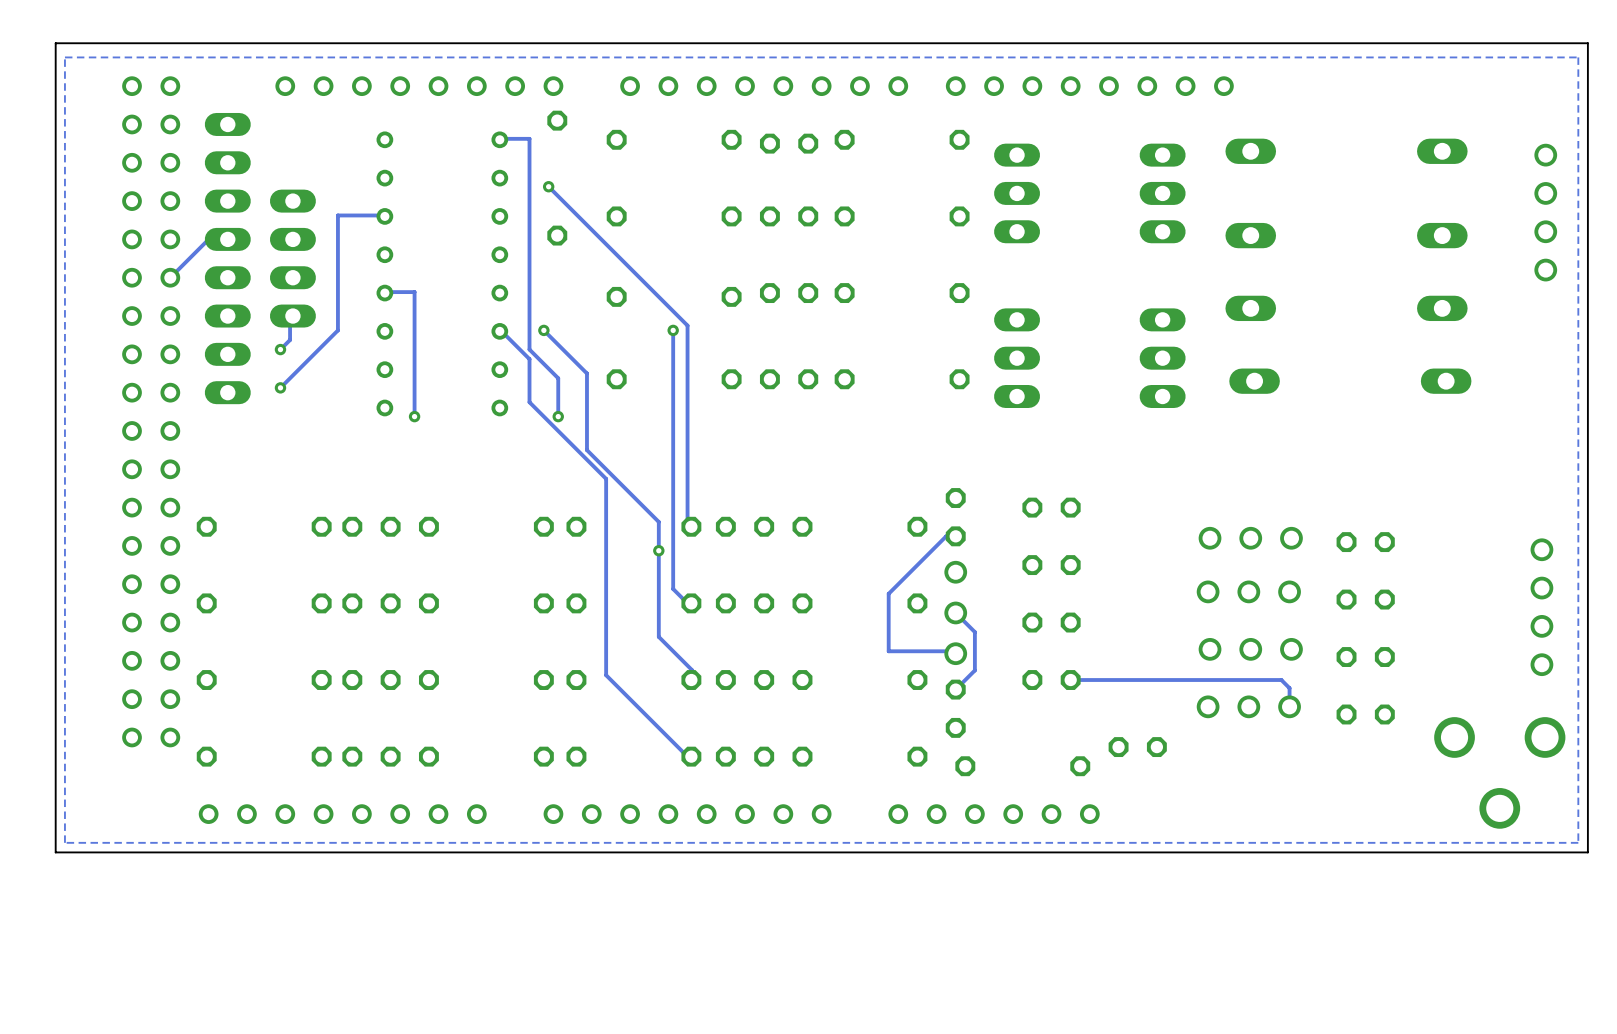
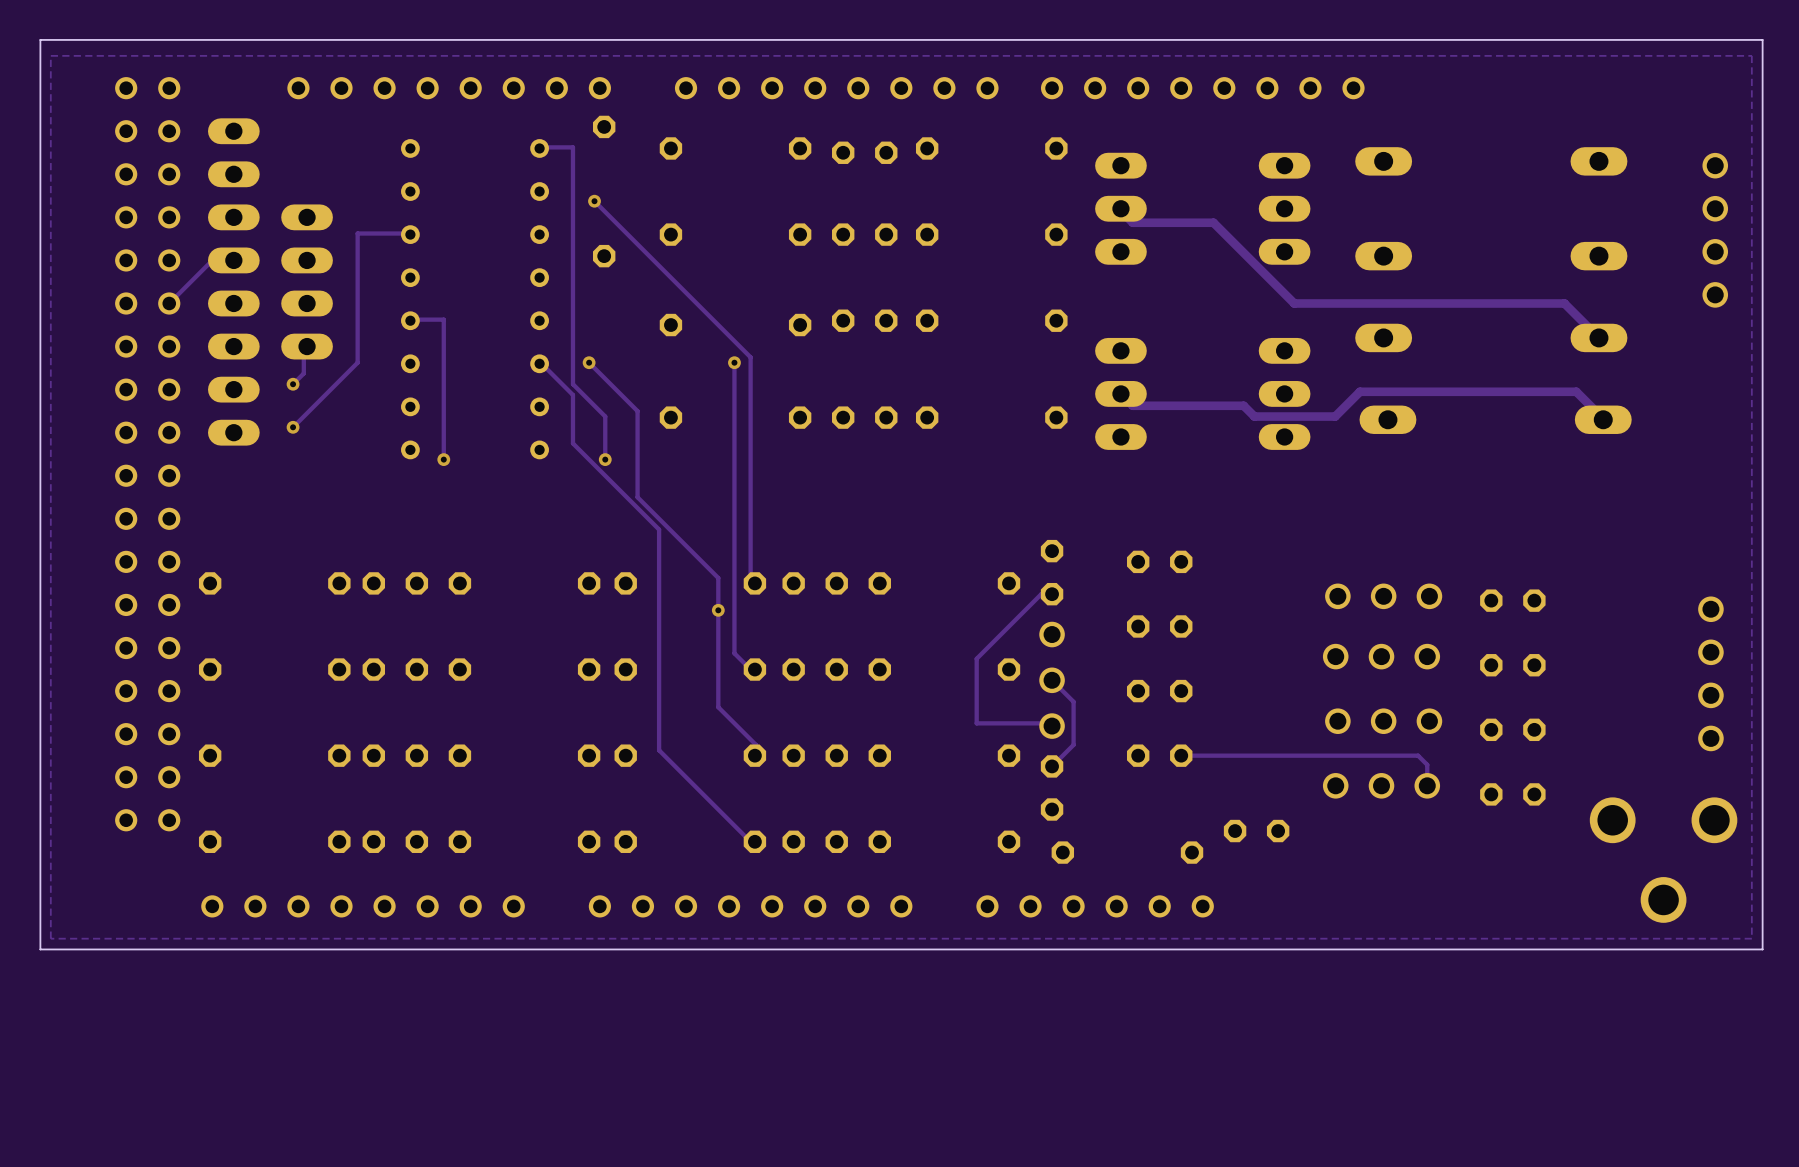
track: none -> (1120, 208) (1132, 222) (1213, 222) (1294, 303) (1564, 303) (1598, 337)
track: none -> (1120, 393) (1132, 405) (1243, 405) (1254, 416) (1335, 416) (1359, 391) (1576, 391) (1603, 419)

